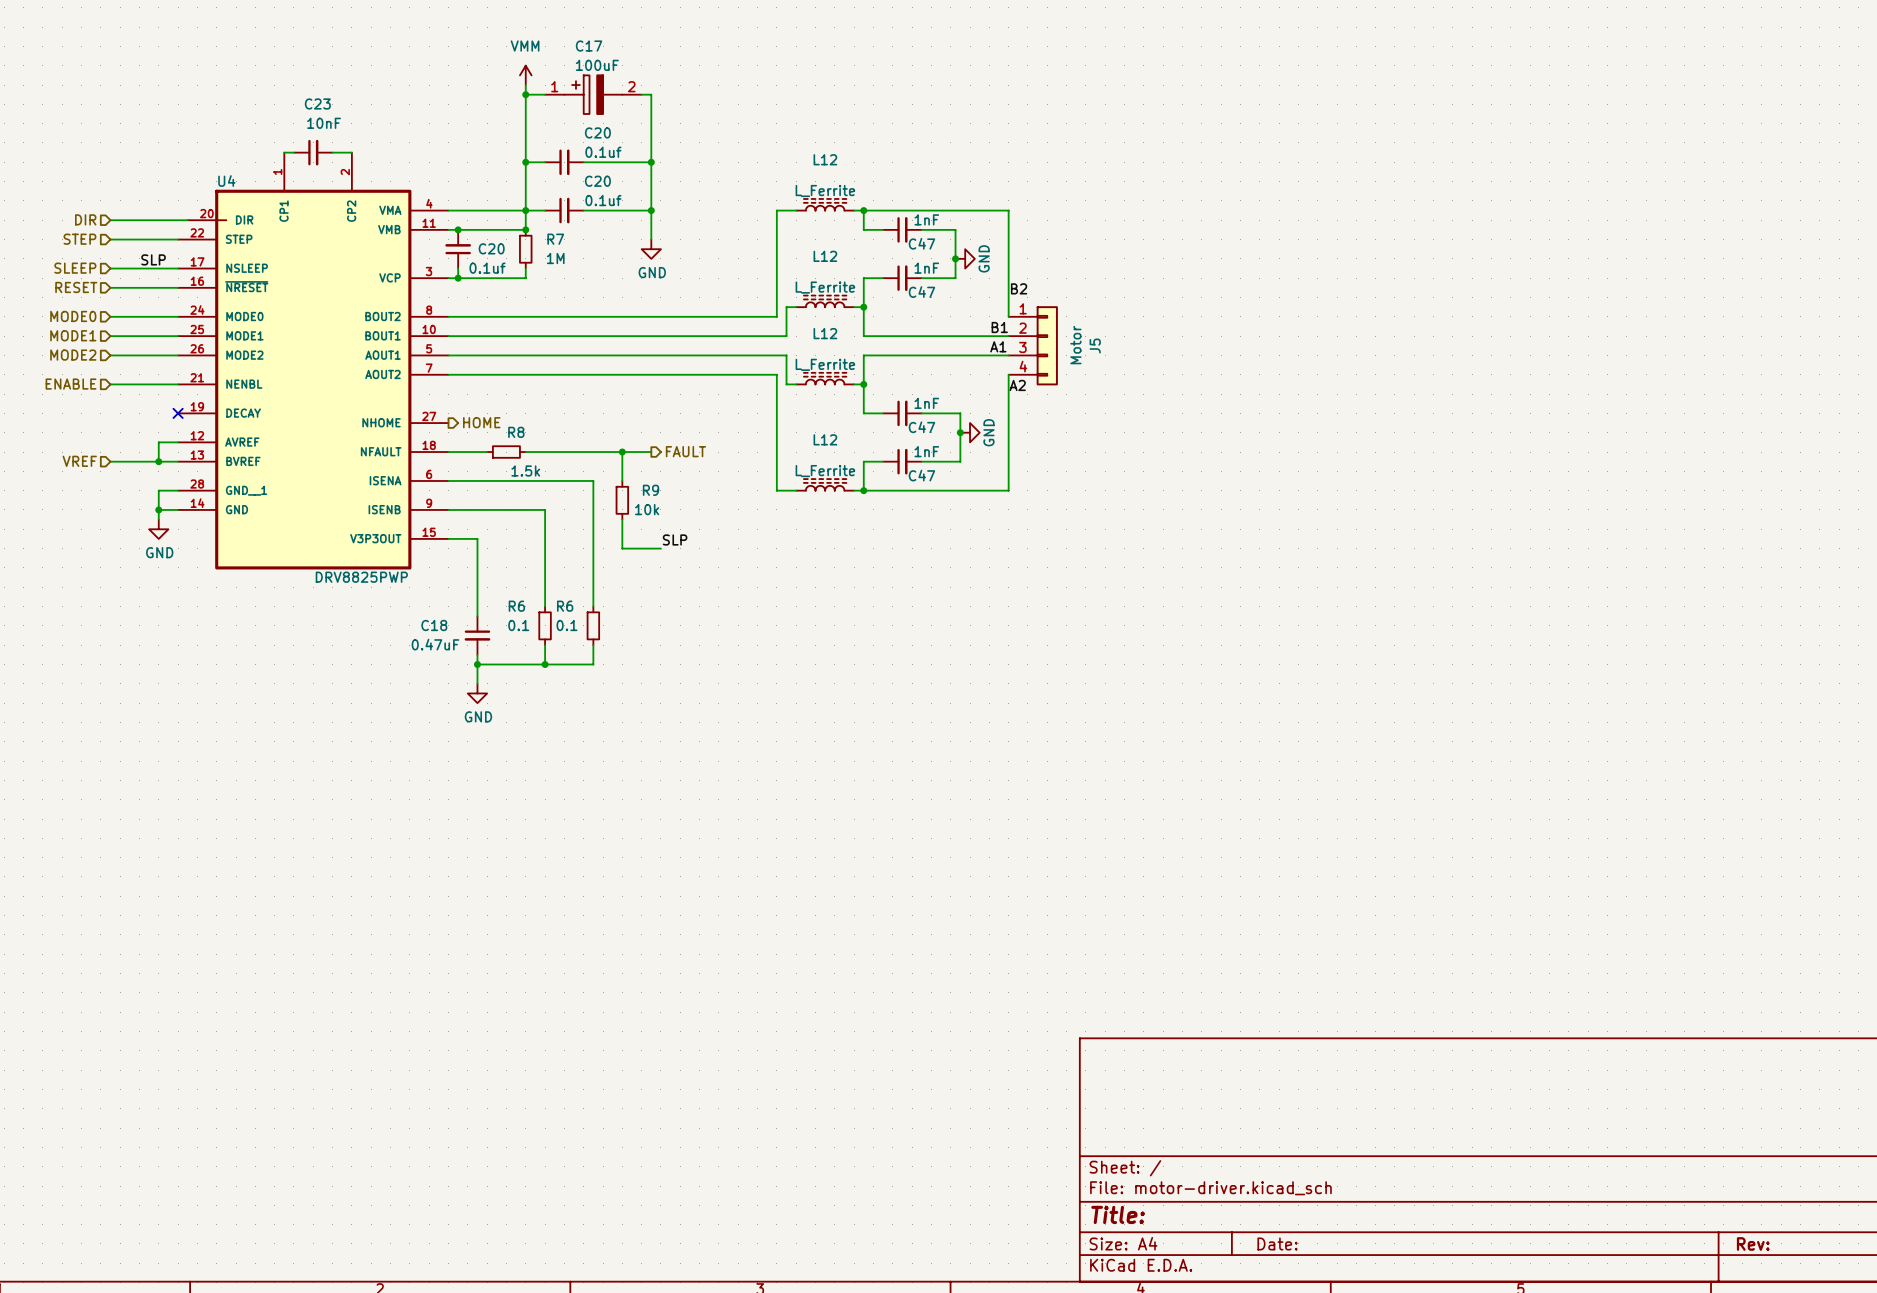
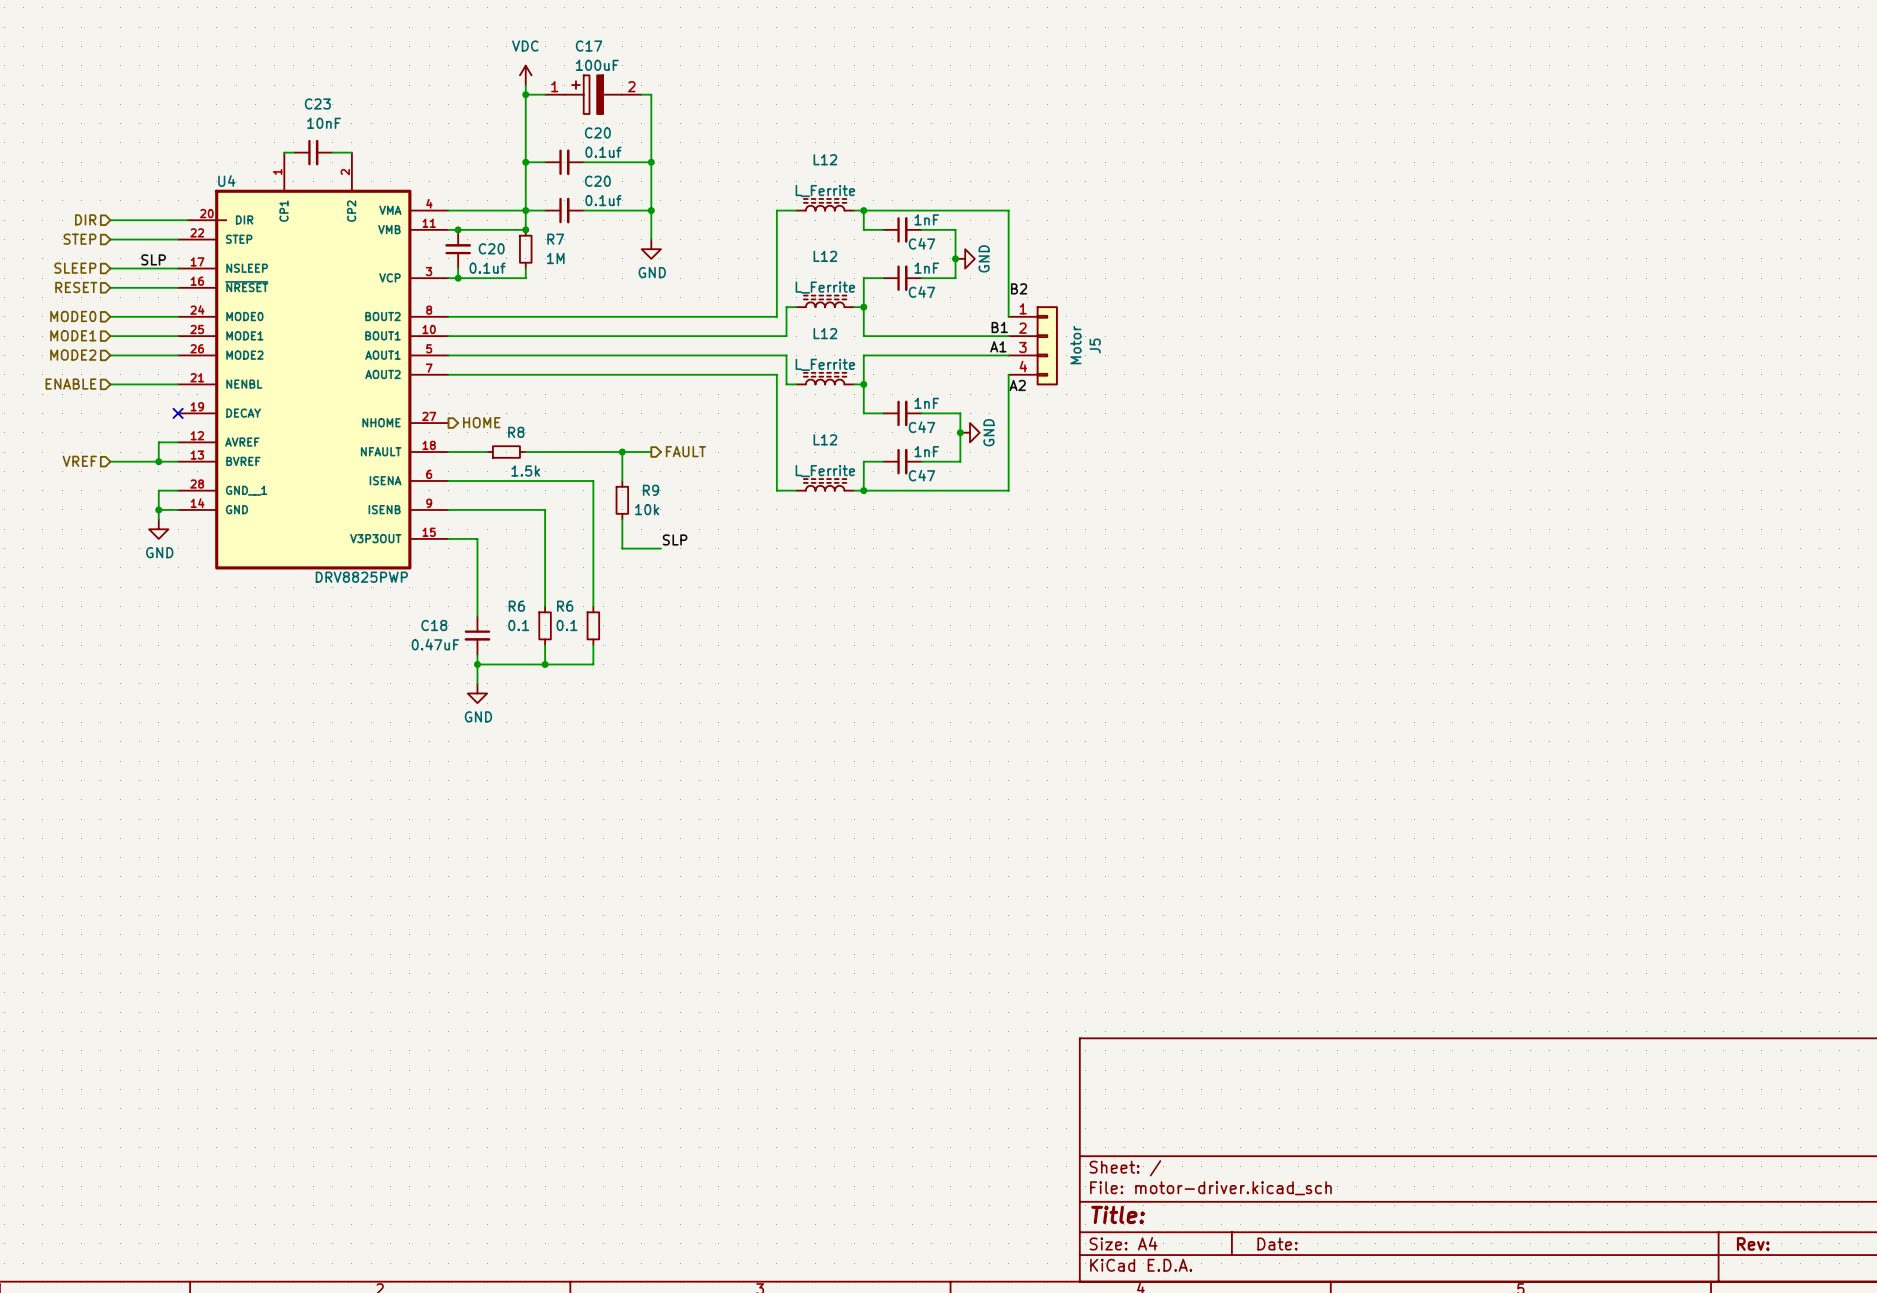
power symbol: VMM (525, 75) -> VDC (525, 75)

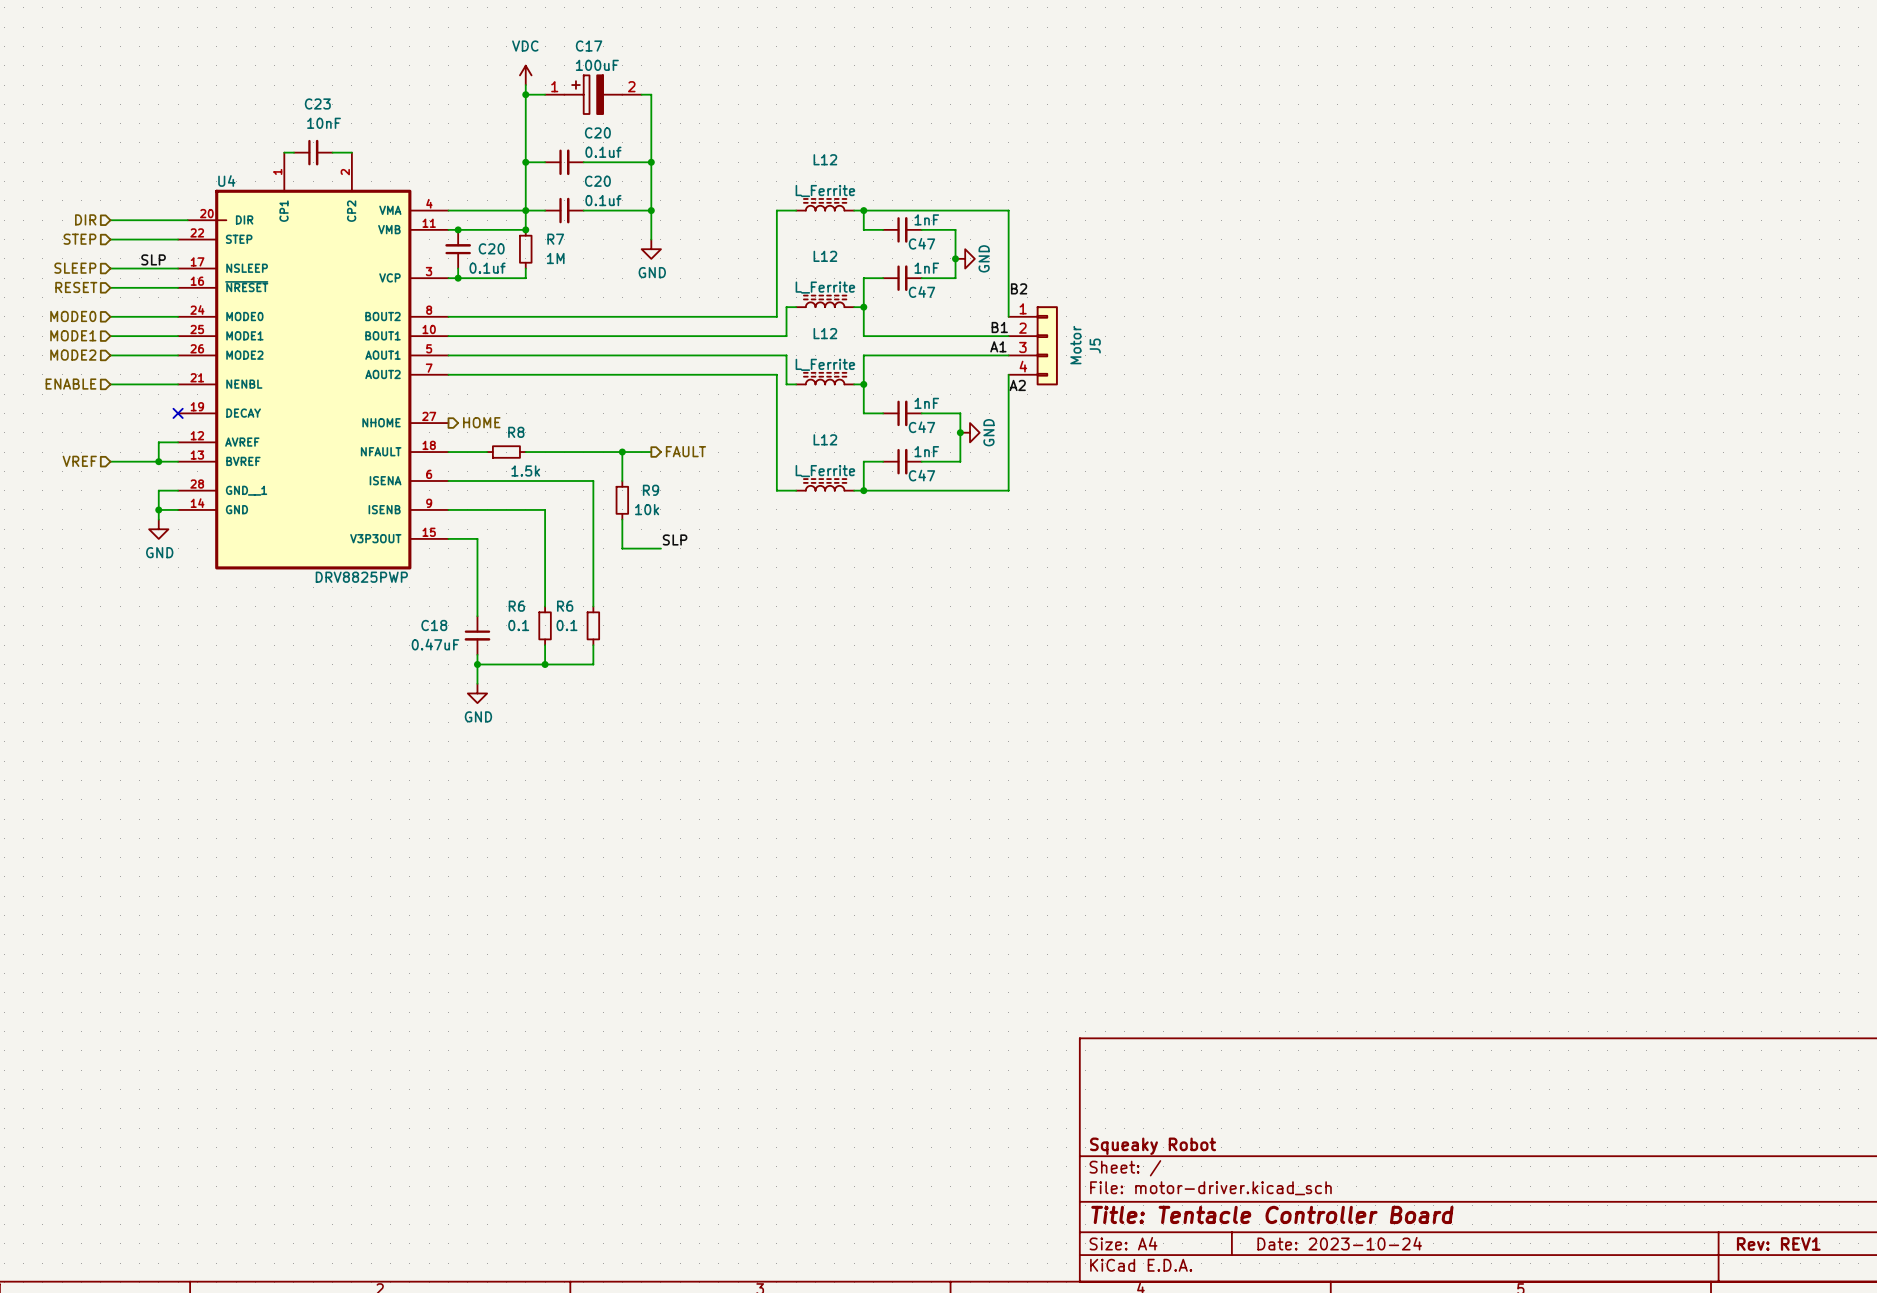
title block: none -> Squeaky Robot (1153, 1146)
title block: Title: (1118, 1214) -> Title: Tentacle Controller Board (1272, 1214)
title block: Date: (1277, 1243) -> Date: 2023-10-24 (1339, 1243)
title block: Rev: (1753, 1243) -> Rev: REV1 (1778, 1243)

